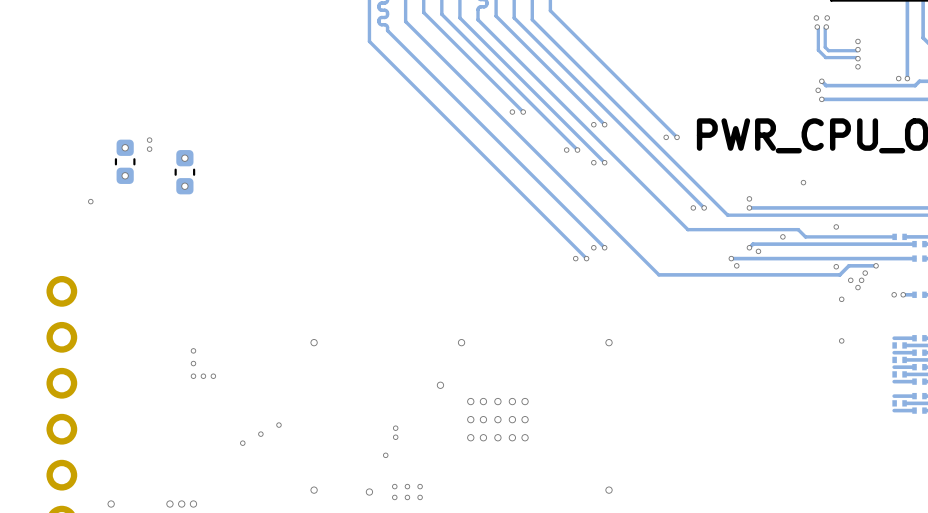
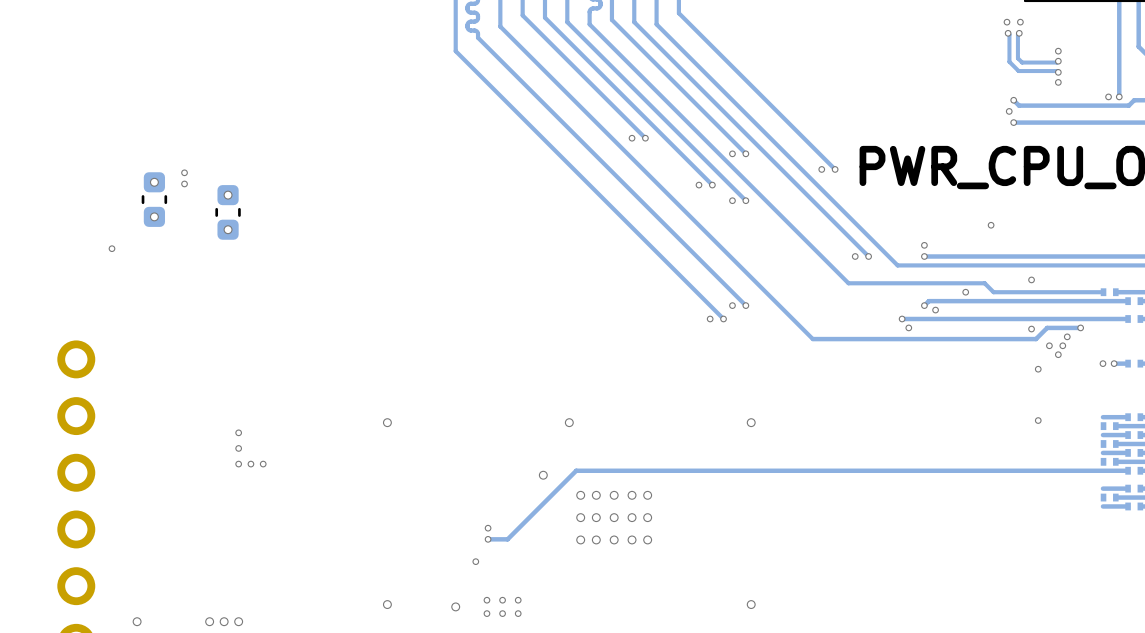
track: none -> (1102, 470) (576, 470) (507, 539) (488, 539)
via: (278, 425) -> none
via: (260, 434) -> none
via: (242, 443) -> none

